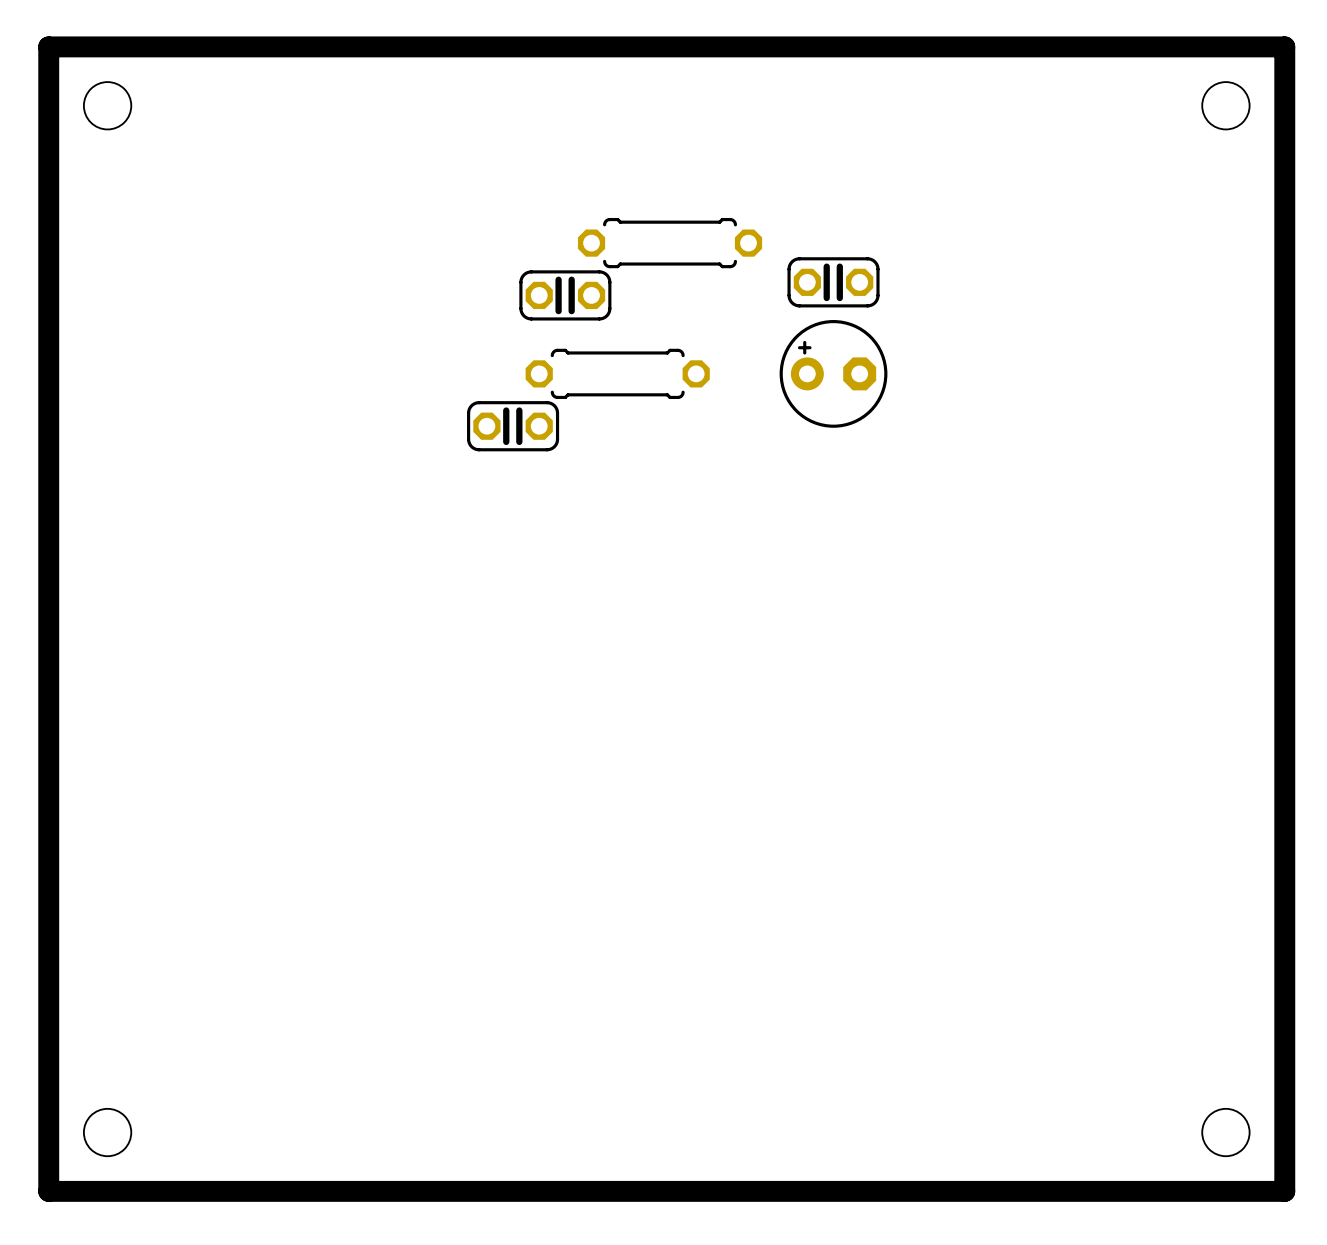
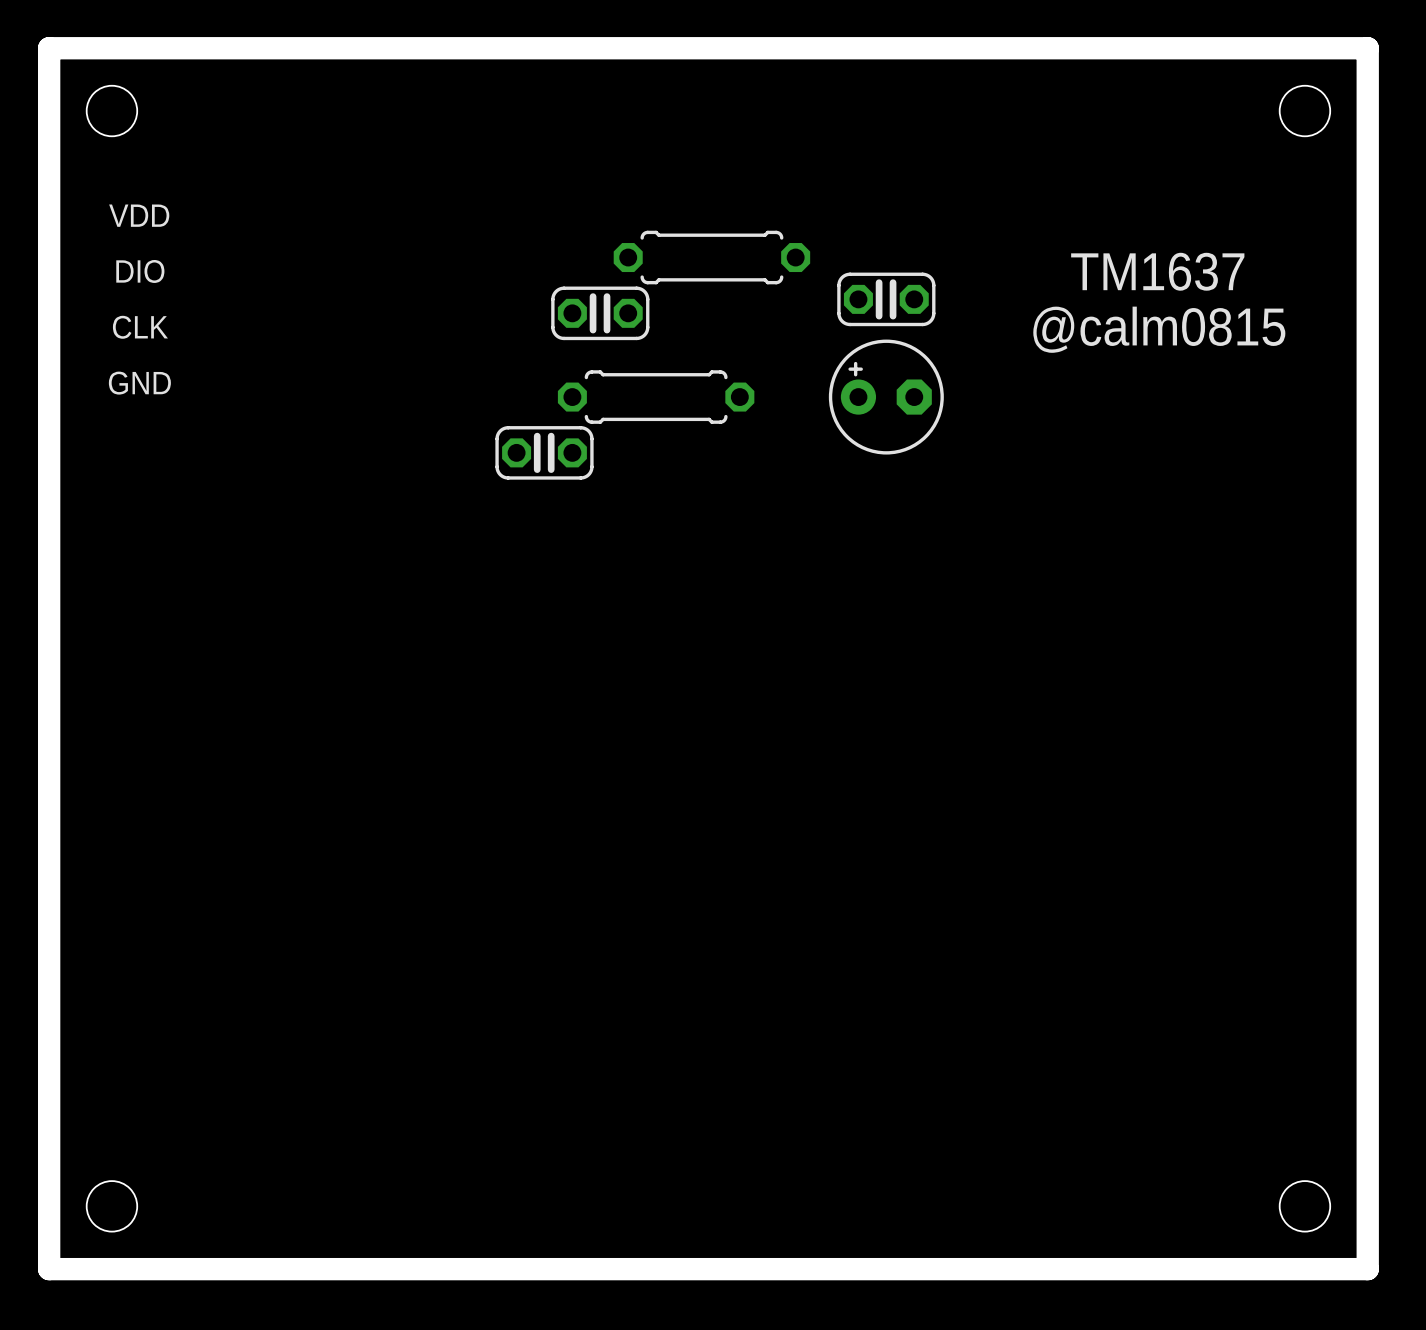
text: none -> VDD (139, 215)
text: none -> DIO (140, 271)
text: none -> TM1637 (1157, 271)
text: none -> CLK (140, 327)
text: none -> @calm0815 (1159, 329)
text: none -> GND (139, 383)

